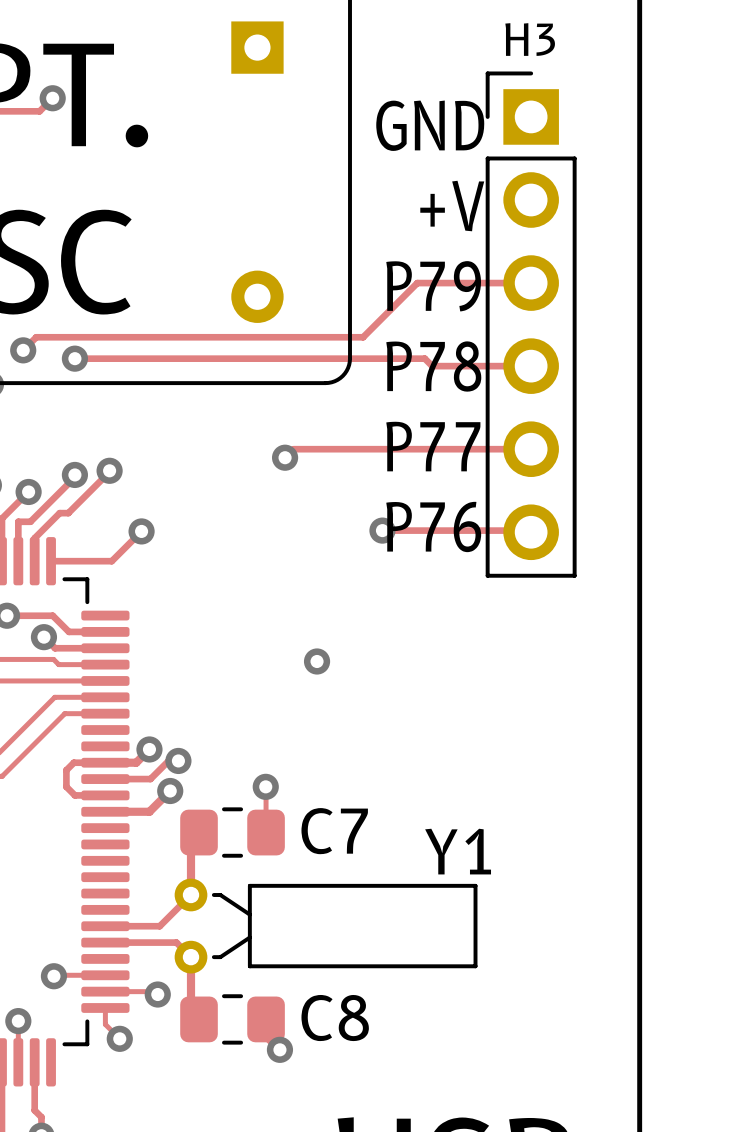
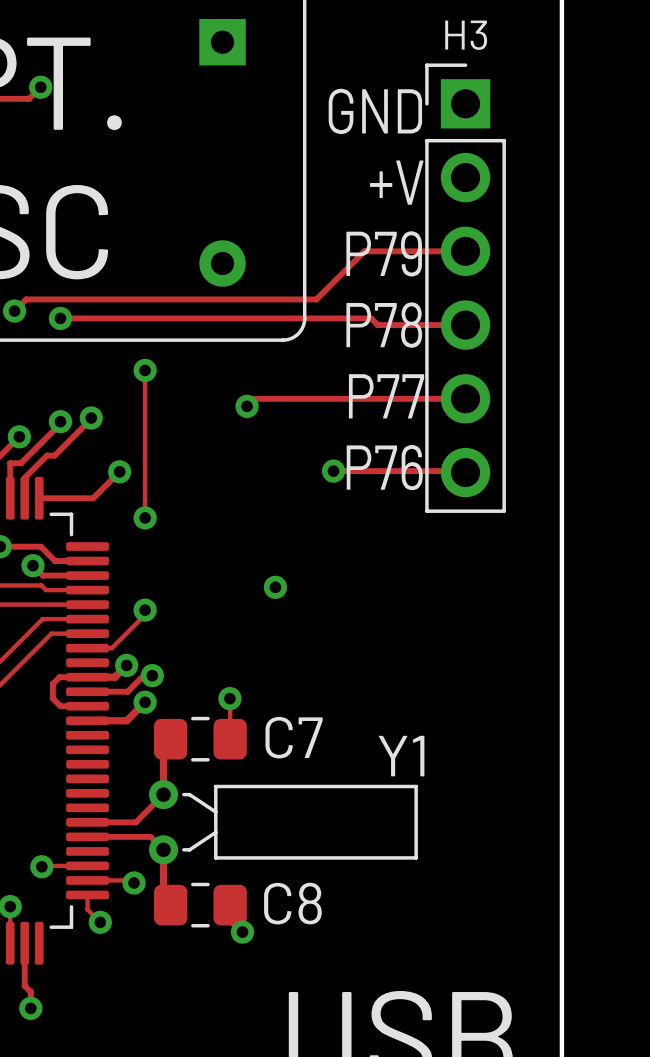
track: none -> (145, 370) (145, 517)
via: none -> (145, 370)
via: none -> (145, 517)
track: none -> (145, 610) (145, 614) (111, 648) (87, 648)
via: none -> (145, 610)

